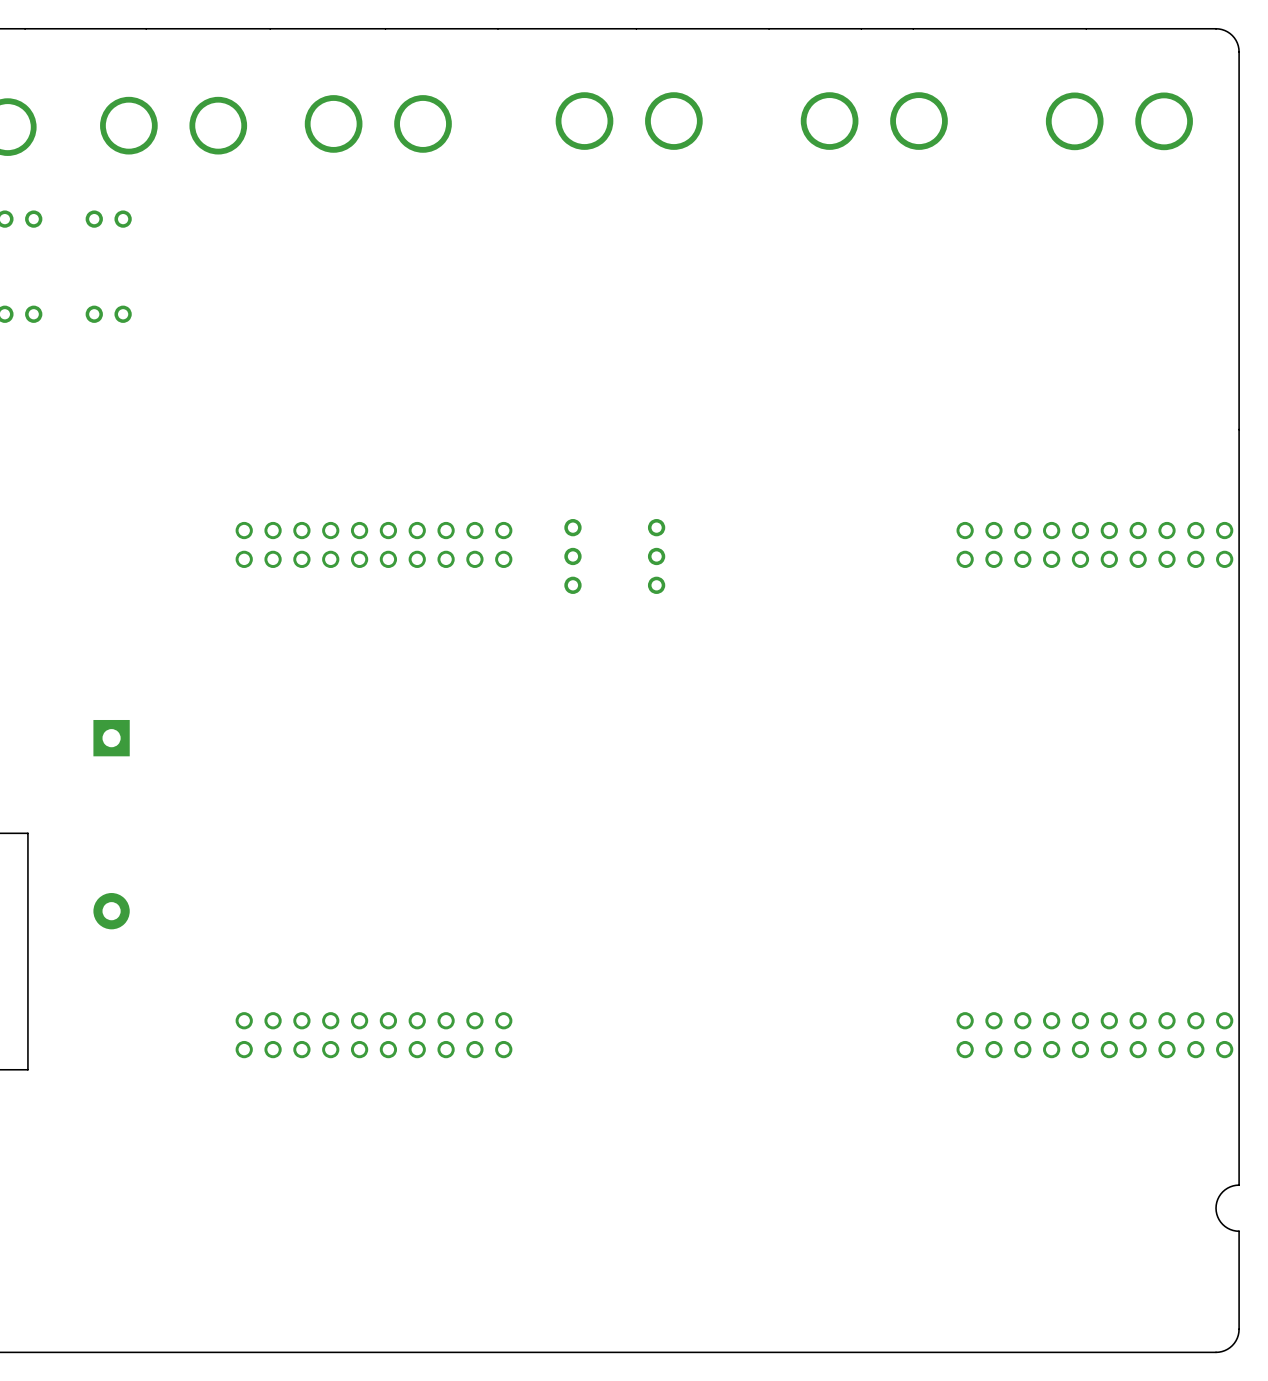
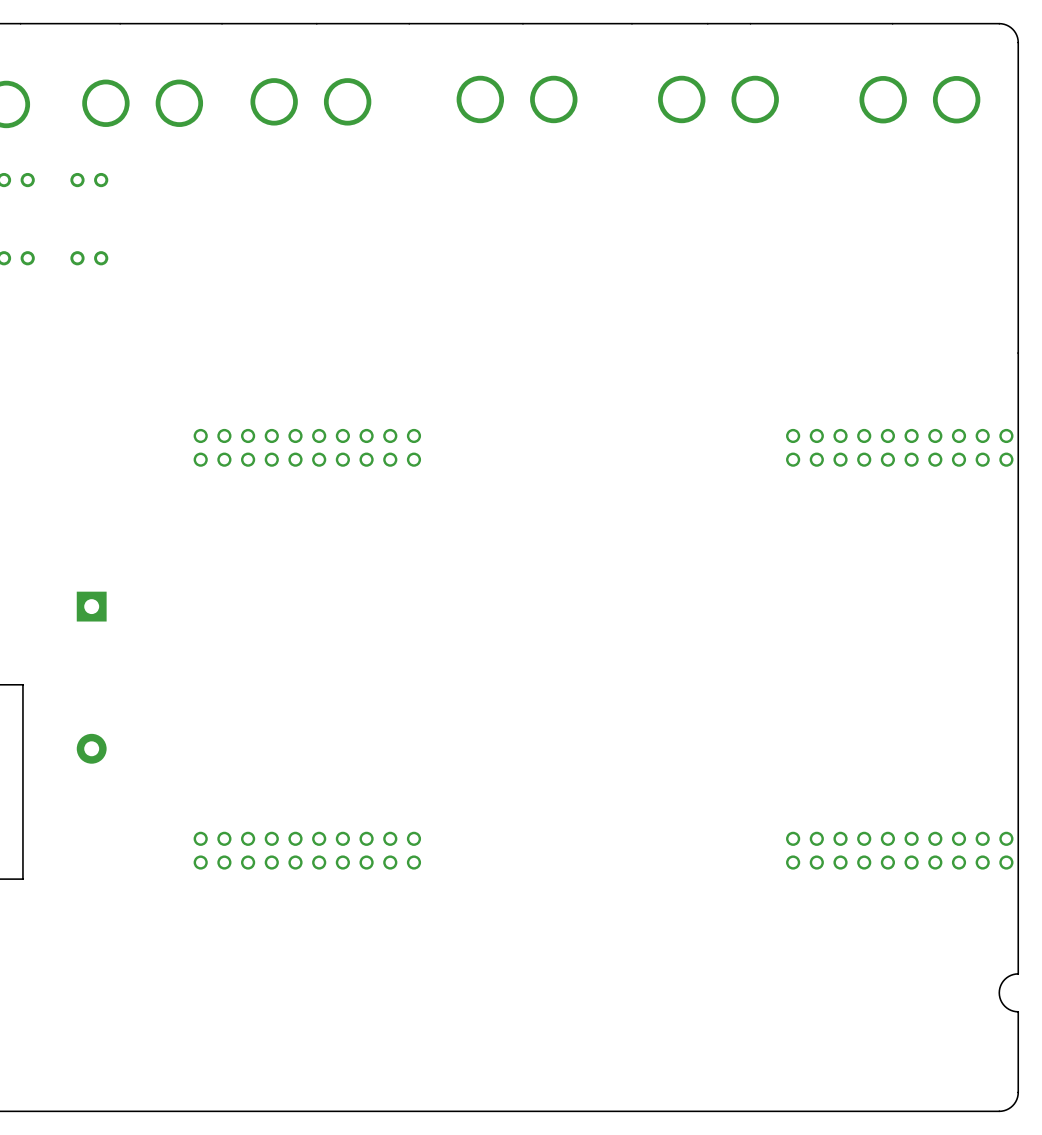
part: (572, 556) -> none
part: (656, 556) -> none

